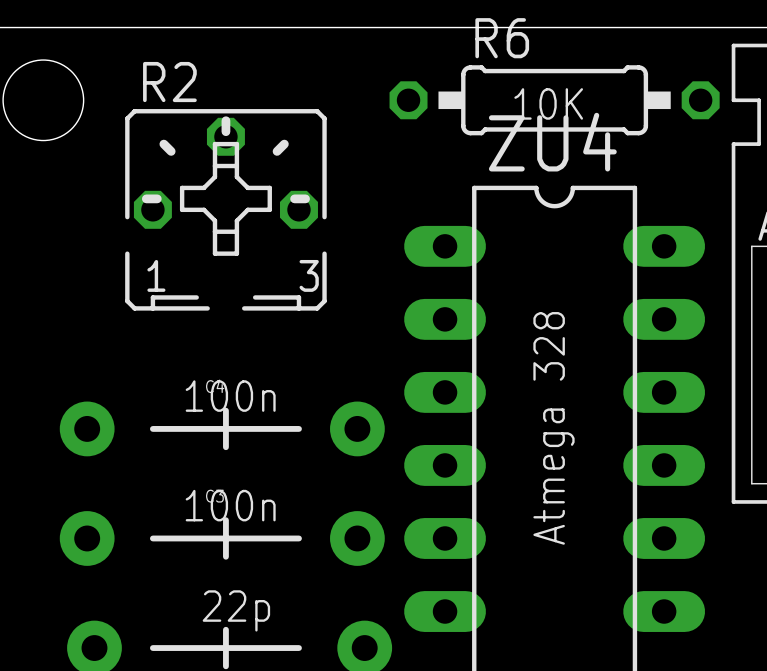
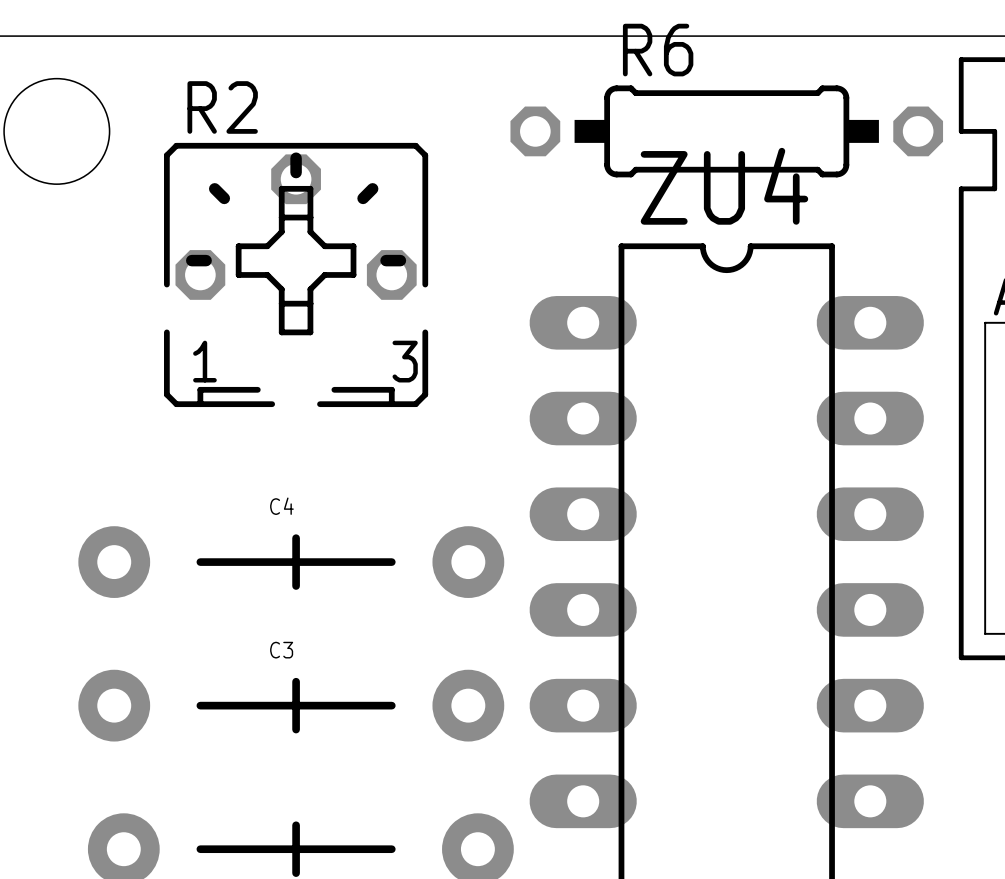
text: 10K (548, 103) -> none
text: 100n (230, 396) -> none
text: Atmega 328 (553, 428) -> none
text: 100n (230, 505) -> none
text: 22p (236, 610) -> none

